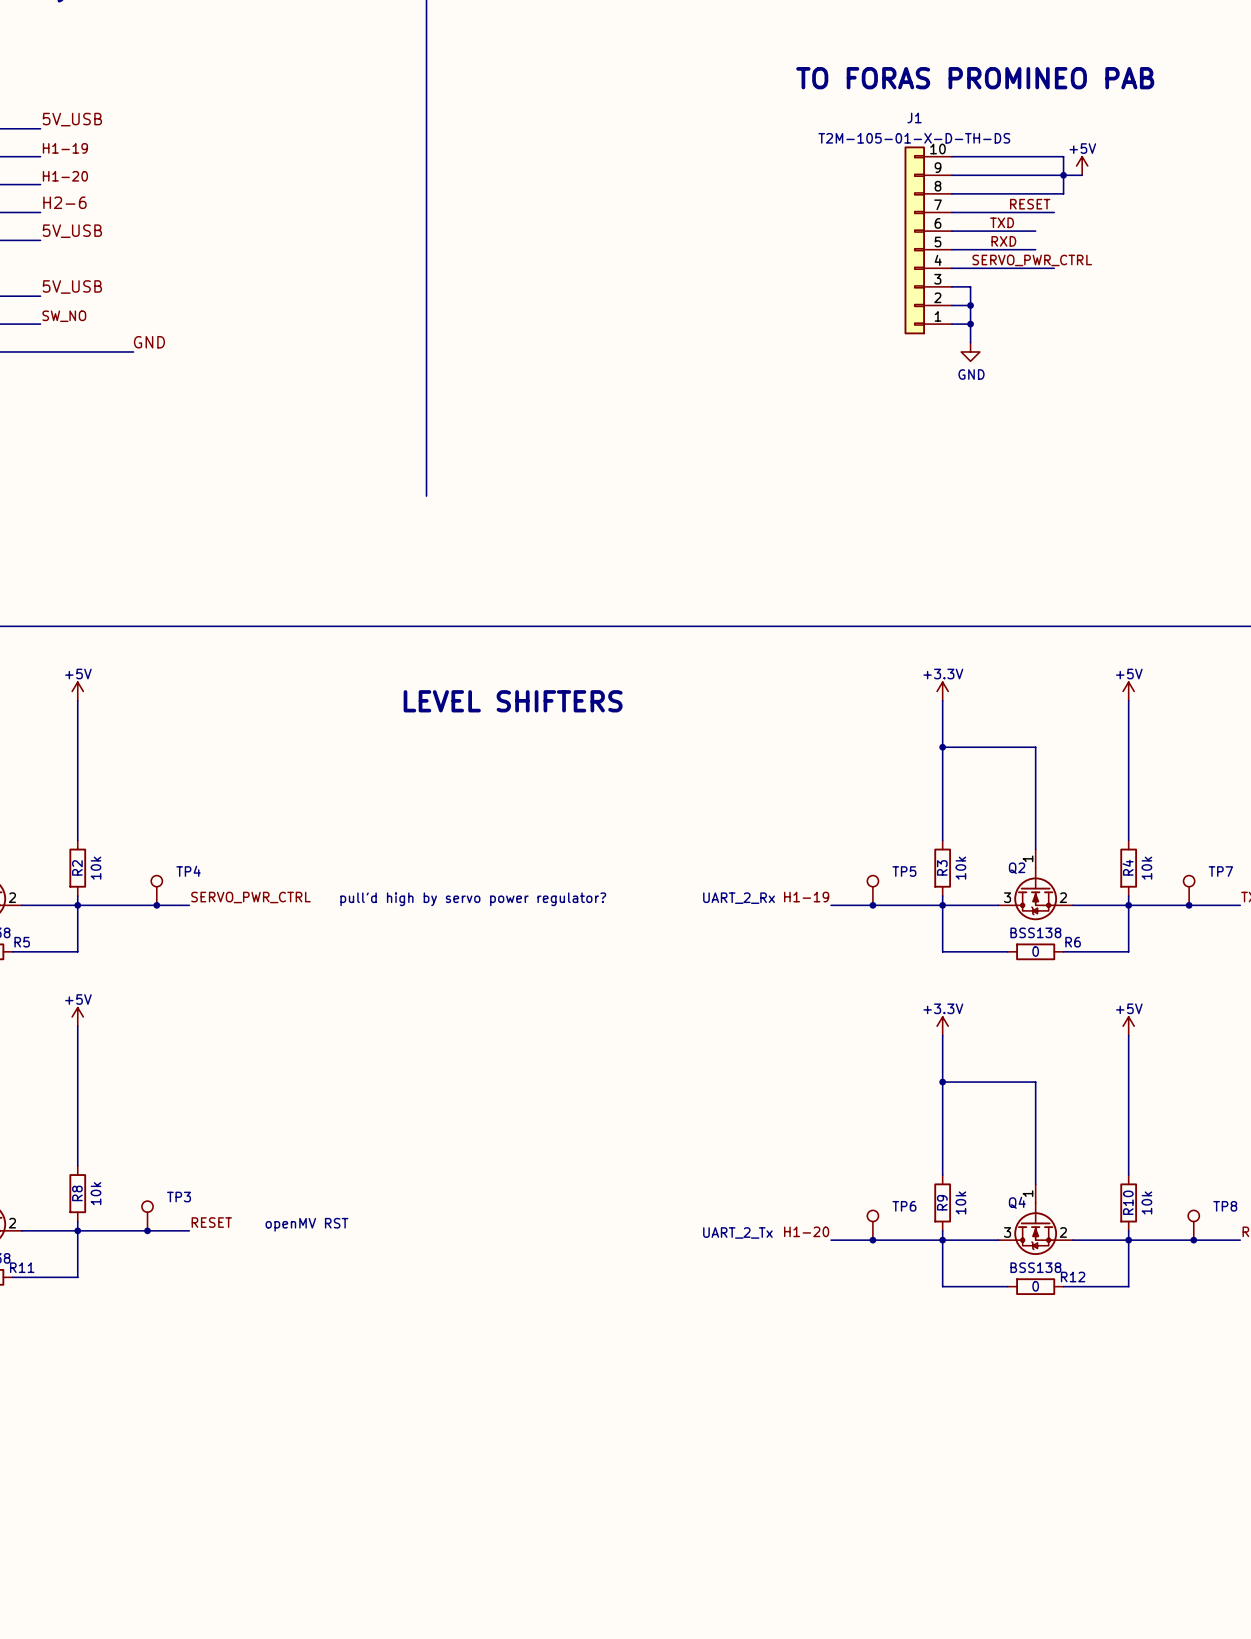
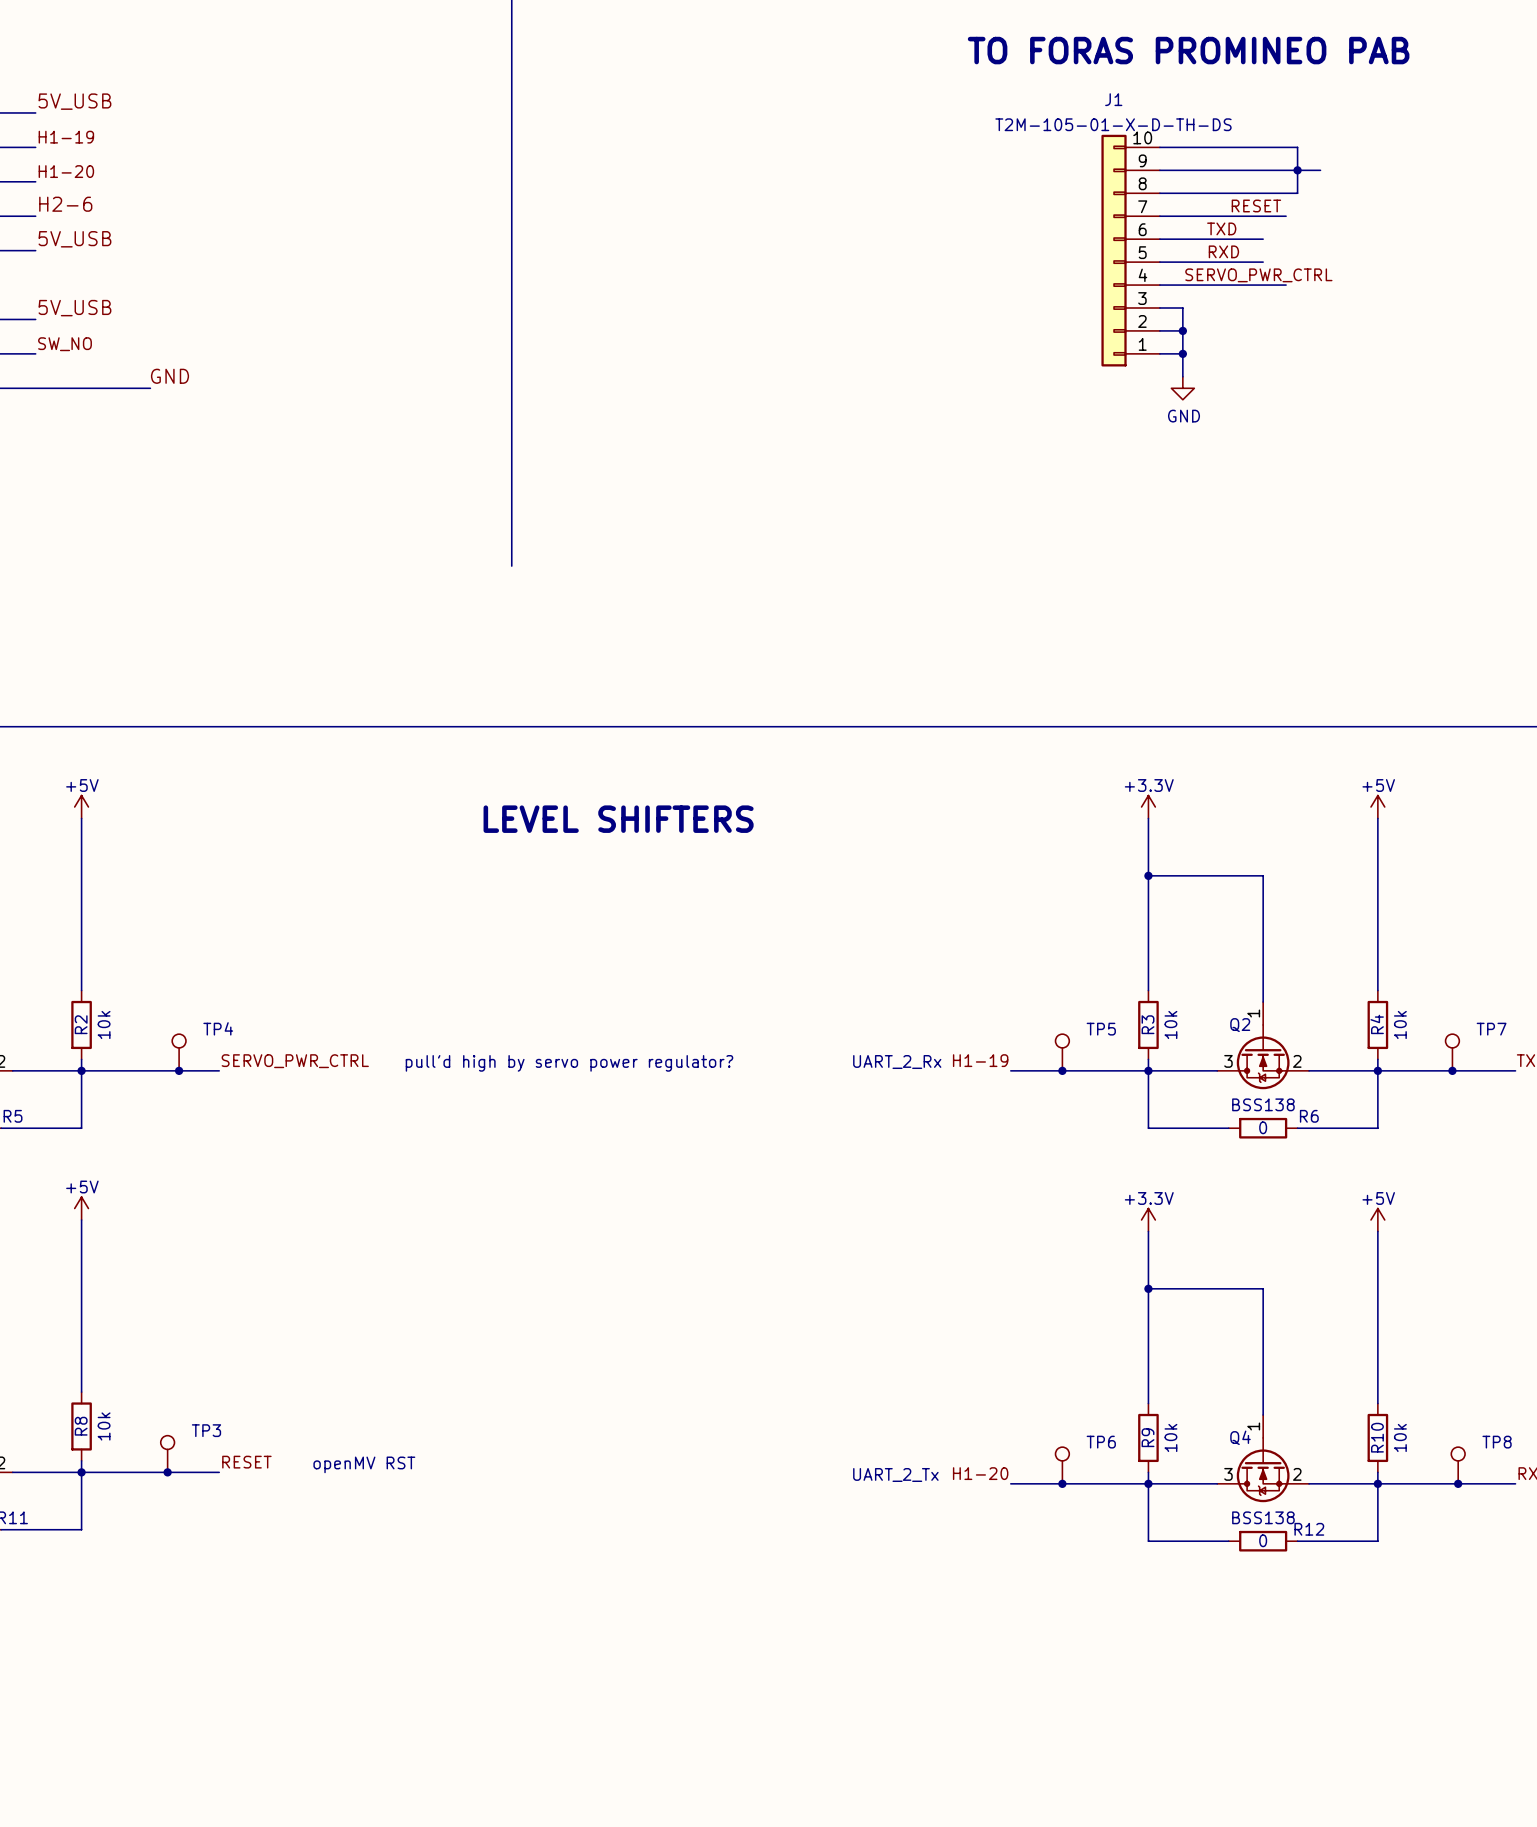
power symbol: +5V (1082, 165) -> none

